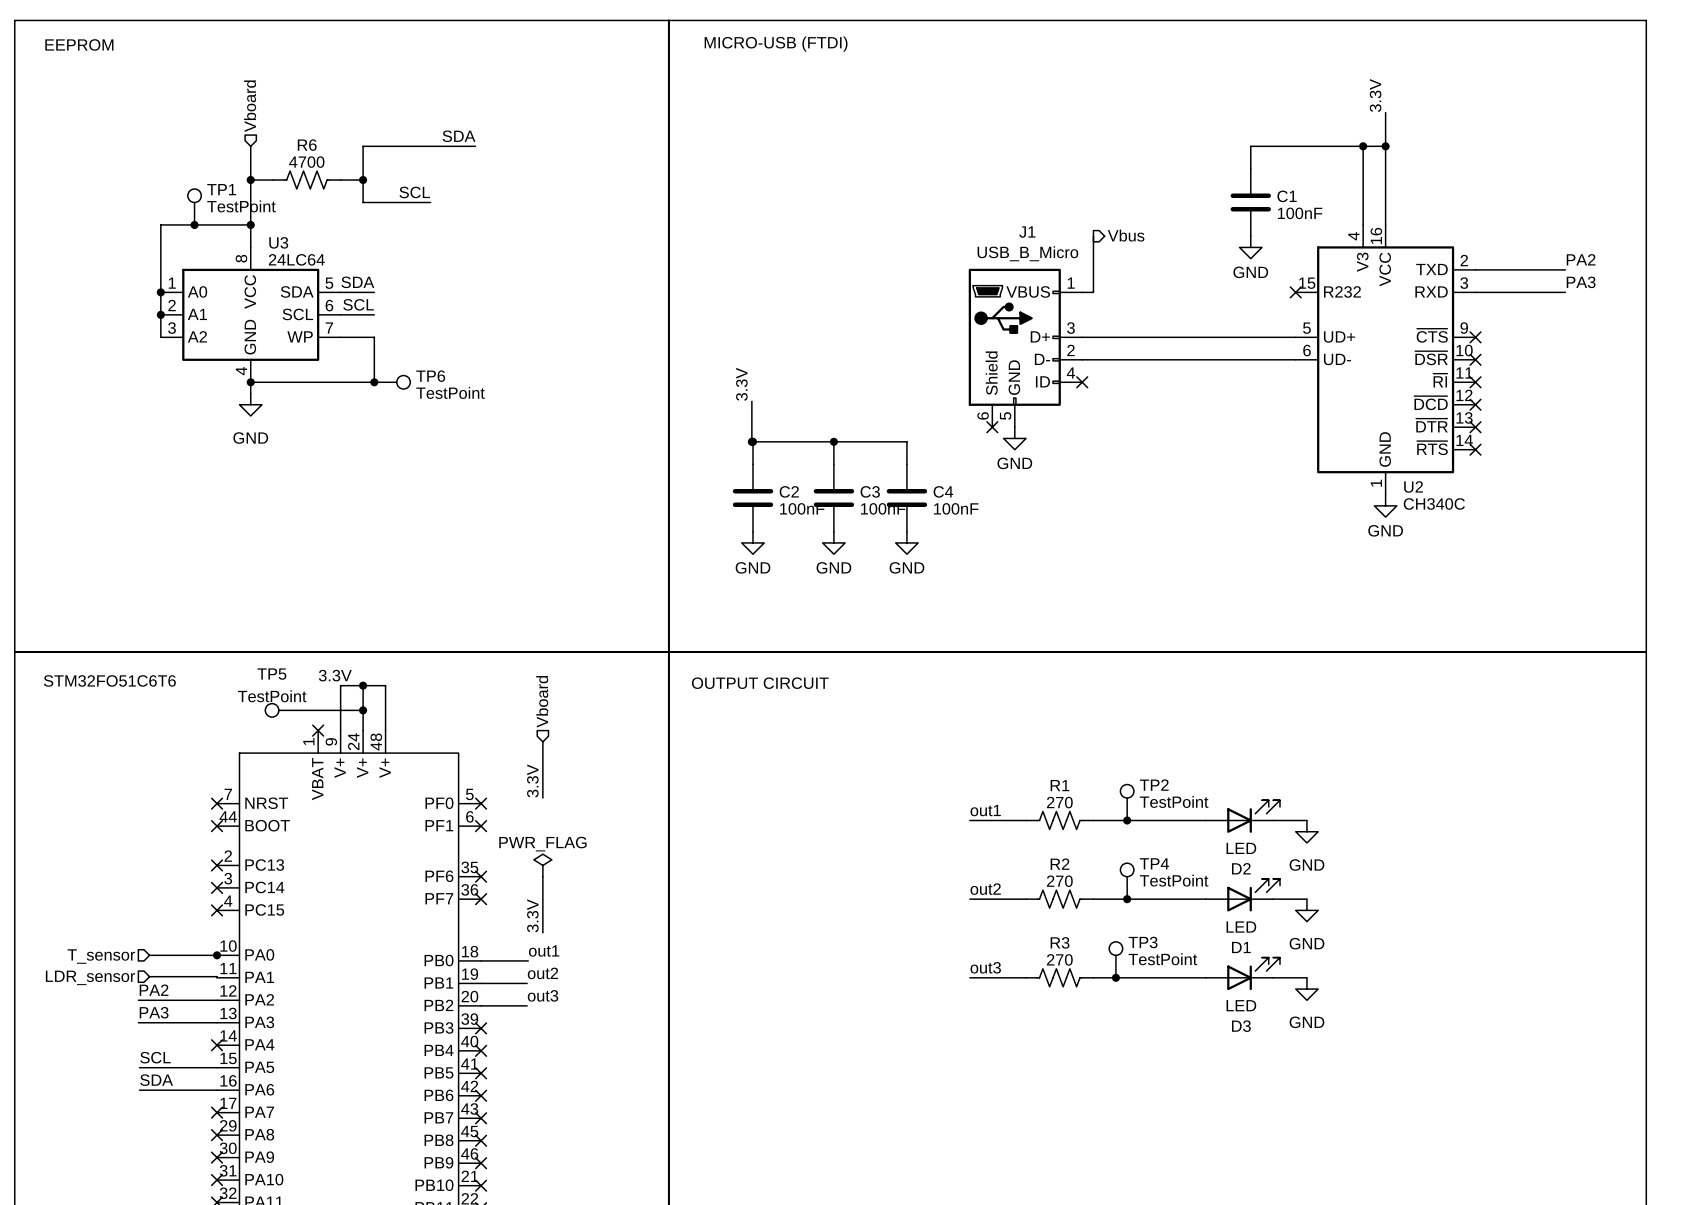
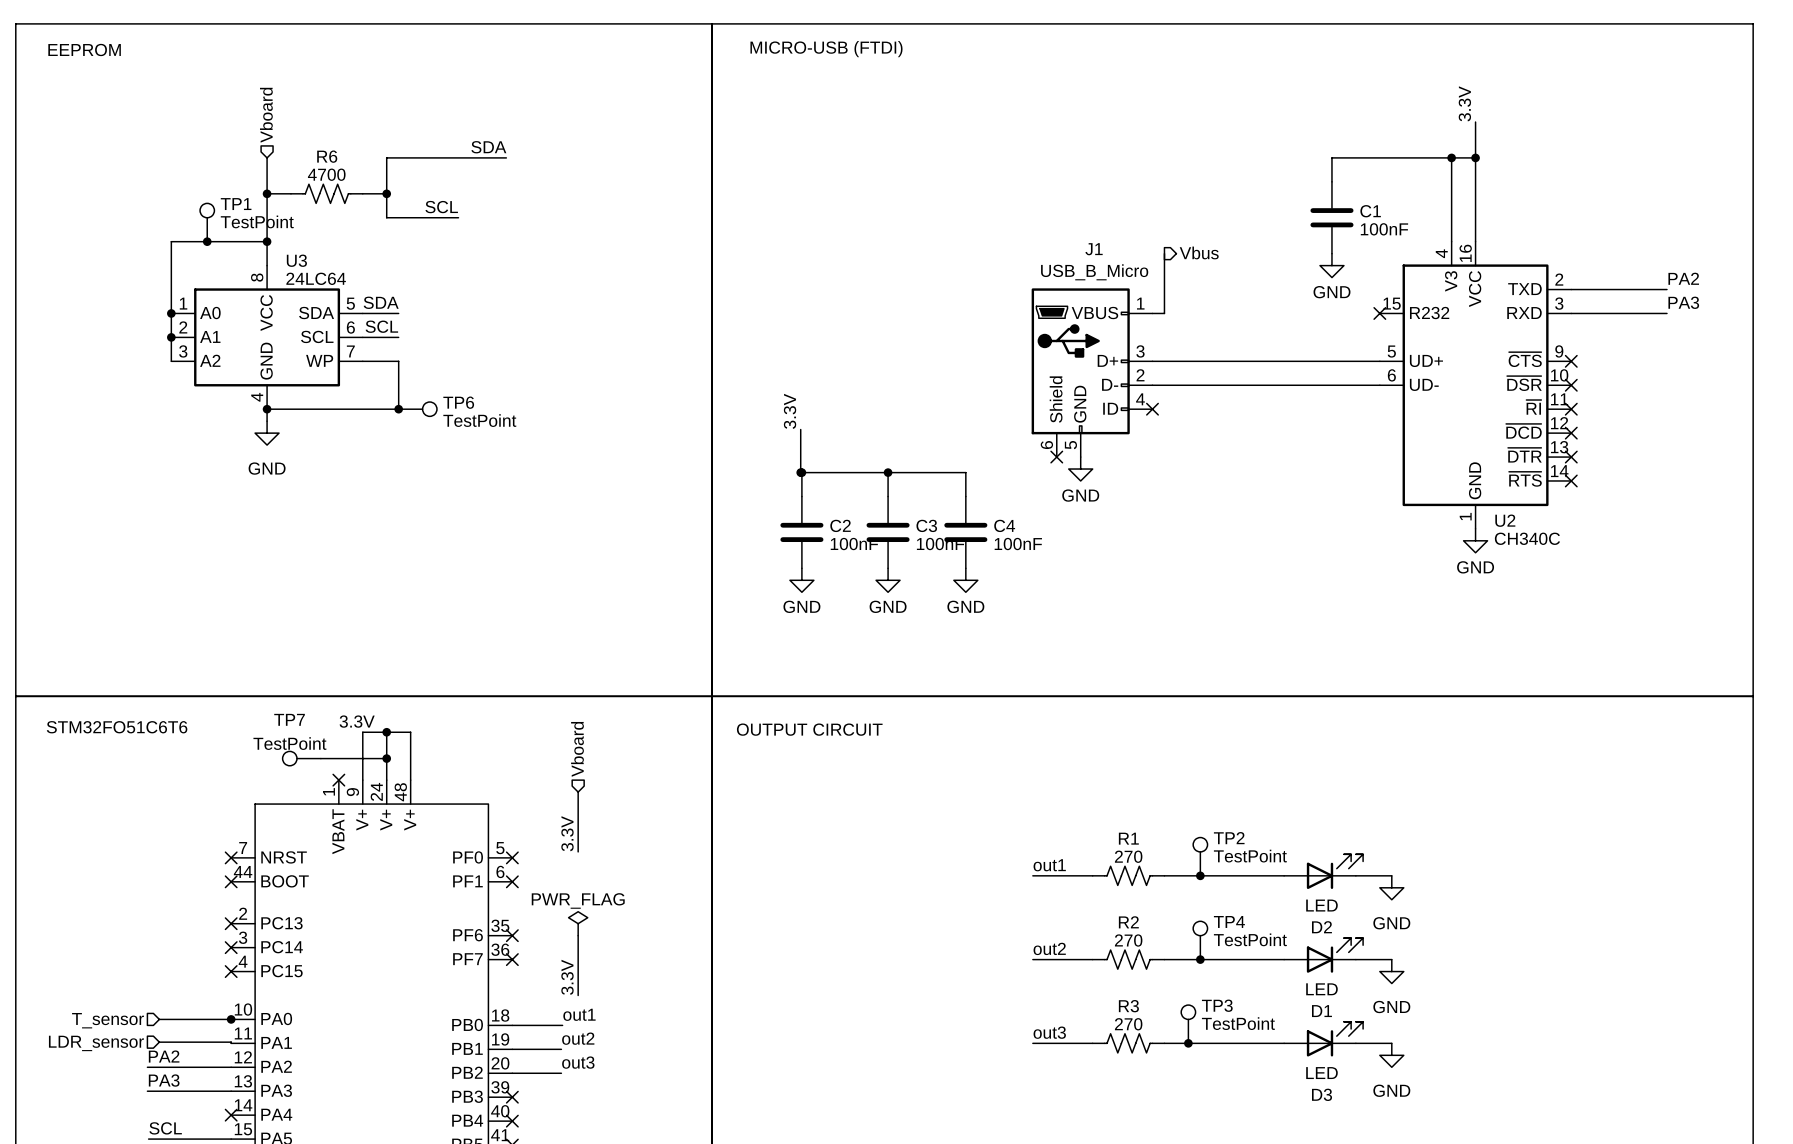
TP5 name: TP5 (271, 674) -> TP7 (289, 719)

